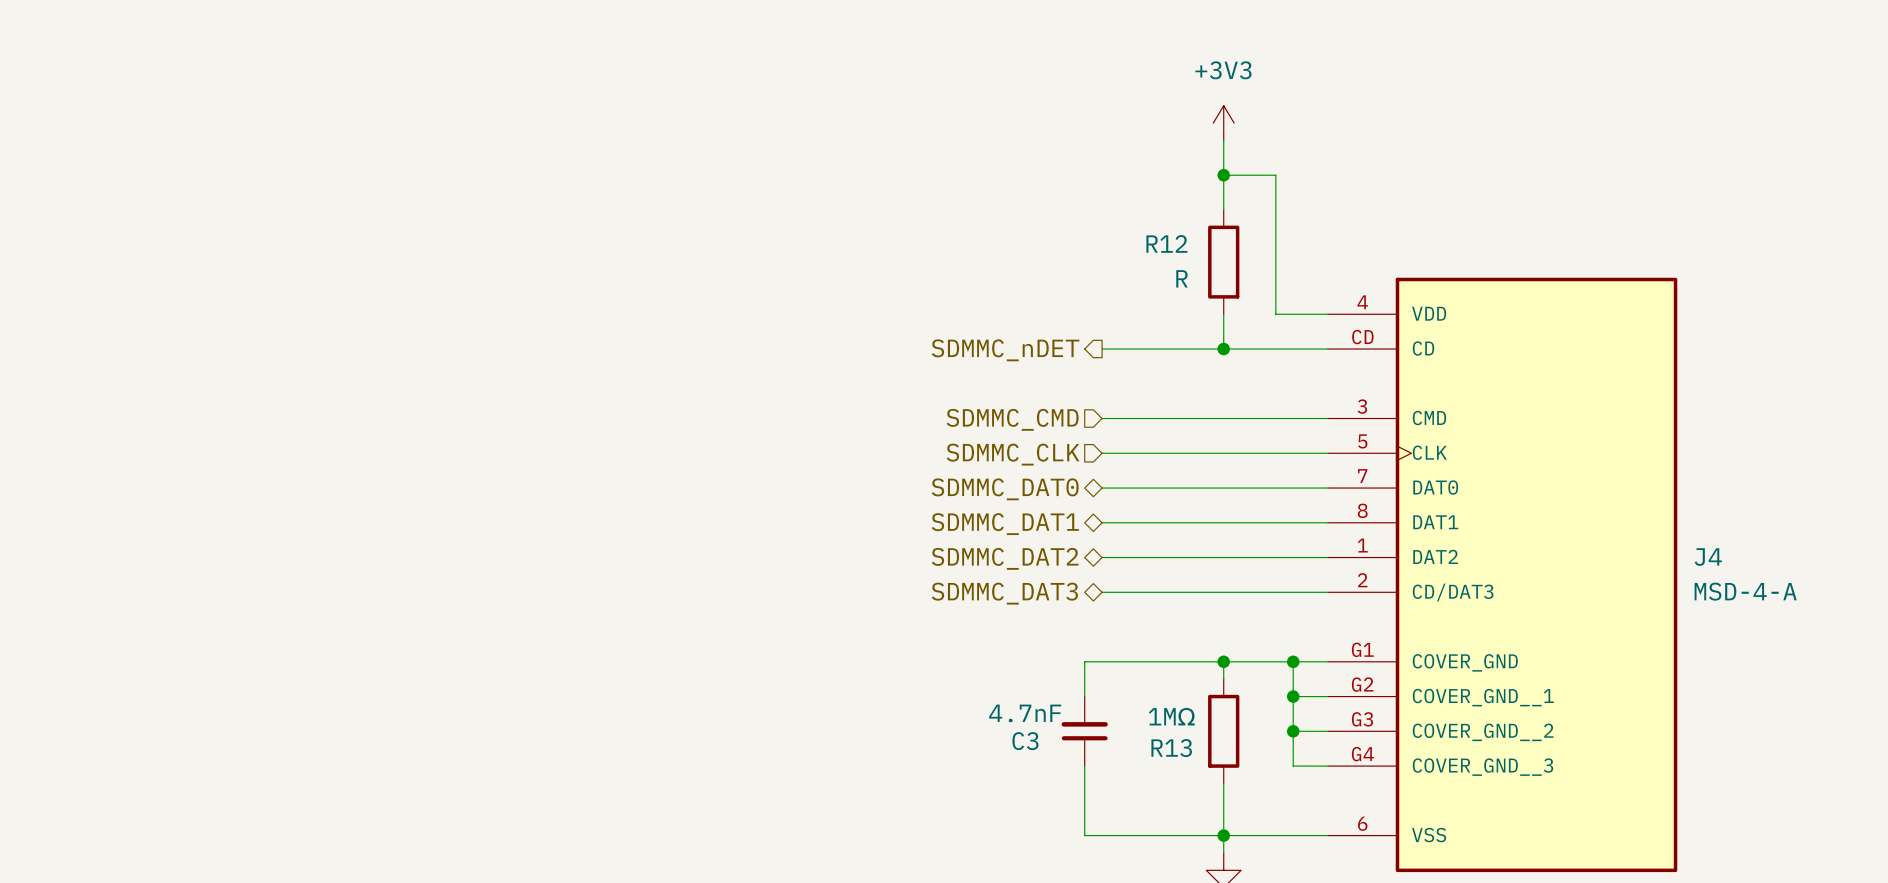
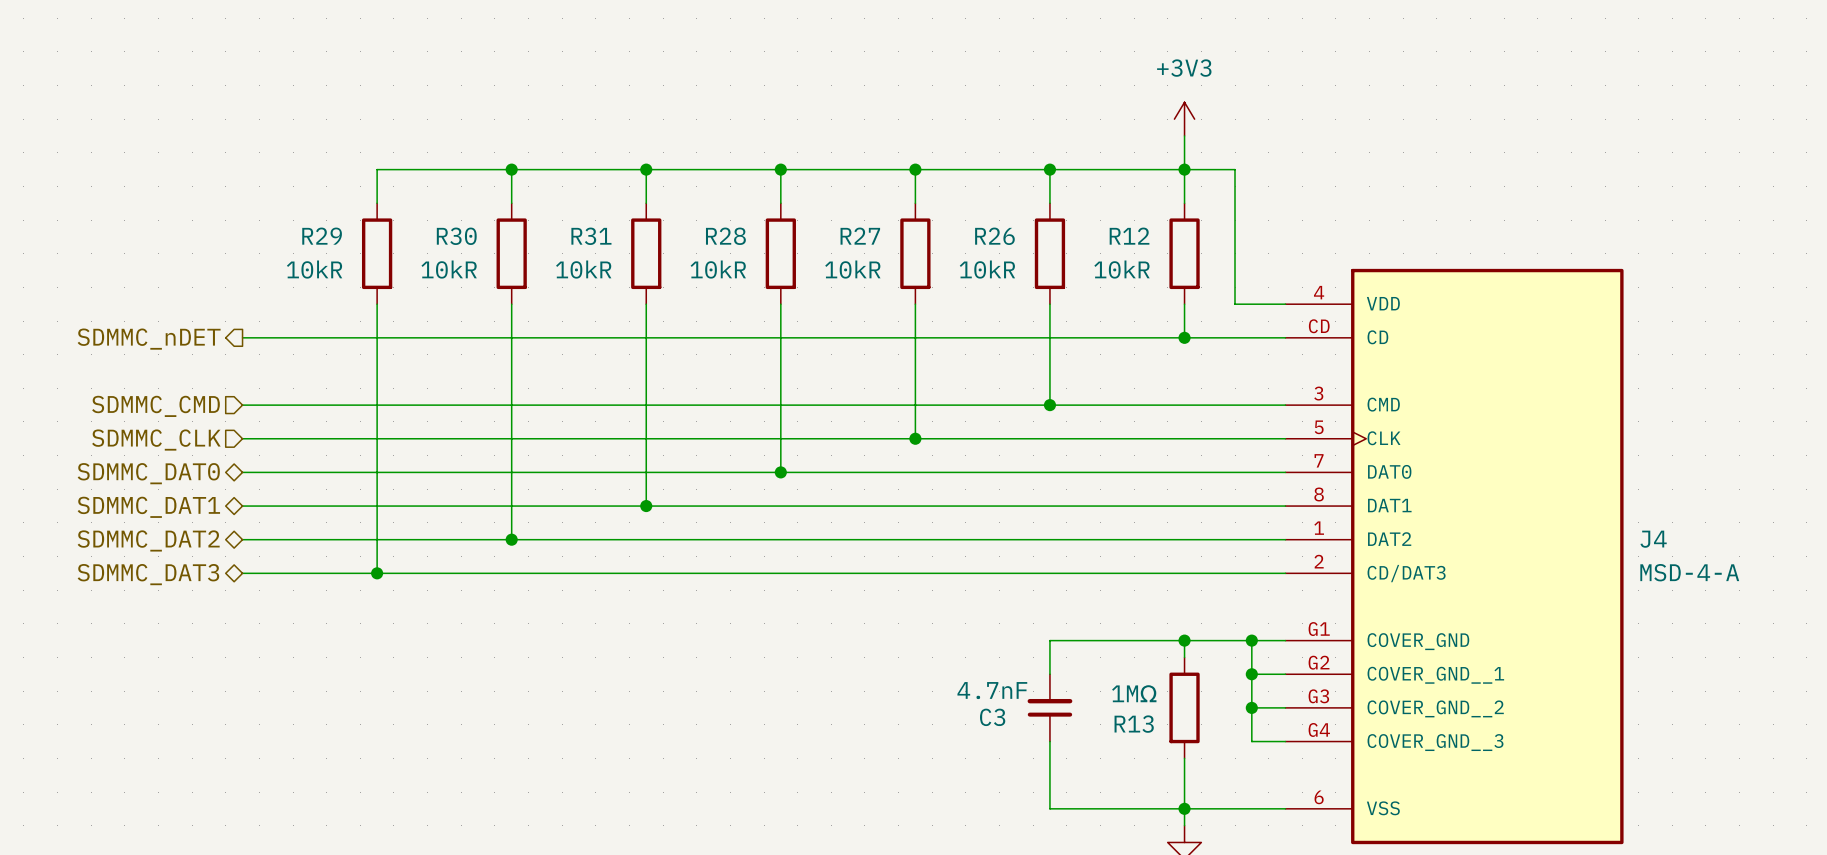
wire: none -> (511, 169) (511, 203)
junction: none -> (511, 169)
wire: none -> (646, 169) (646, 203)
junction: none -> (646, 169)
wire: none -> (780, 169) (780, 203)
junction: none -> (780, 169)
wire: none -> (915, 169) (915, 203)
junction: none -> (915, 169)
wire: none -> (1049, 169) (1049, 203)
junction: none -> (1049, 169)
wire: none -> (1184, 169) (377, 169) (377, 203)
R29: none -> 10kR (377, 253)
R30: none -> 10kR (511, 253)
R31: none -> 10kR (646, 253)
R28: none -> 10kR (780, 253)
R27: none -> 10kR (915, 253)
R26: none -> 10kR (1049, 253)
R12 value: R (1181, 278) -> 10kR (1121, 269)
wire: none -> (377, 304) (377, 573)
wire: none -> (511, 304) (511, 539)
wire: none -> (646, 304) (646, 506)
wire: none -> (780, 304) (780, 472)
wire: none -> (915, 304) (915, 438)
wire: none -> (1049, 304) (1049, 405)
wire: none -> (242, 337) (1066, 337)
hierarchical label: none -> SDMMC_nDET (149, 339)
hierarchical label: SDMMC_nDET (1005, 350) -> none
wire: none -> (242, 405) (1066, 405)
junction: none -> (1049, 405)
hierarchical label: none -> SDMMC_CMD (155, 406)
hierarchical label: SDMMC_CMD (1012, 419) -> none
wire: none -> (242, 438) (1066, 438)
junction: none -> (915, 438)
hierarchical label: none -> SDMMC_CLK (156, 440)
hierarchical label: SDMMC_CLK (1013, 454) -> none
wire: none -> (242, 472) (1066, 472)
junction: none -> (780, 472)
hierarchical label: none -> SDMMC_DAT0 (148, 473)
hierarchical label: SDMMC_DAT0 (1005, 489) -> none
wire: none -> (242, 506) (1066, 506)
junction: none -> (646, 506)
hierarchical label: none -> SDMMC_DAT1 (148, 507)
hierarchical label: SDMMC_DAT1 (1005, 524) -> none
wire: none -> (242, 539) (1066, 539)
junction: none -> (511, 539)
hierarchical label: none -> SDMMC_DAT2 (148, 540)
hierarchical label: SDMMC_DAT2 (1005, 558) -> none
wire: none -> (242, 573) (1066, 573)
junction: none -> (377, 573)
hierarchical label: none -> SDMMC_DAT3 (148, 574)
hierarchical label: SDMMC_DAT3 (1004, 593) -> none

